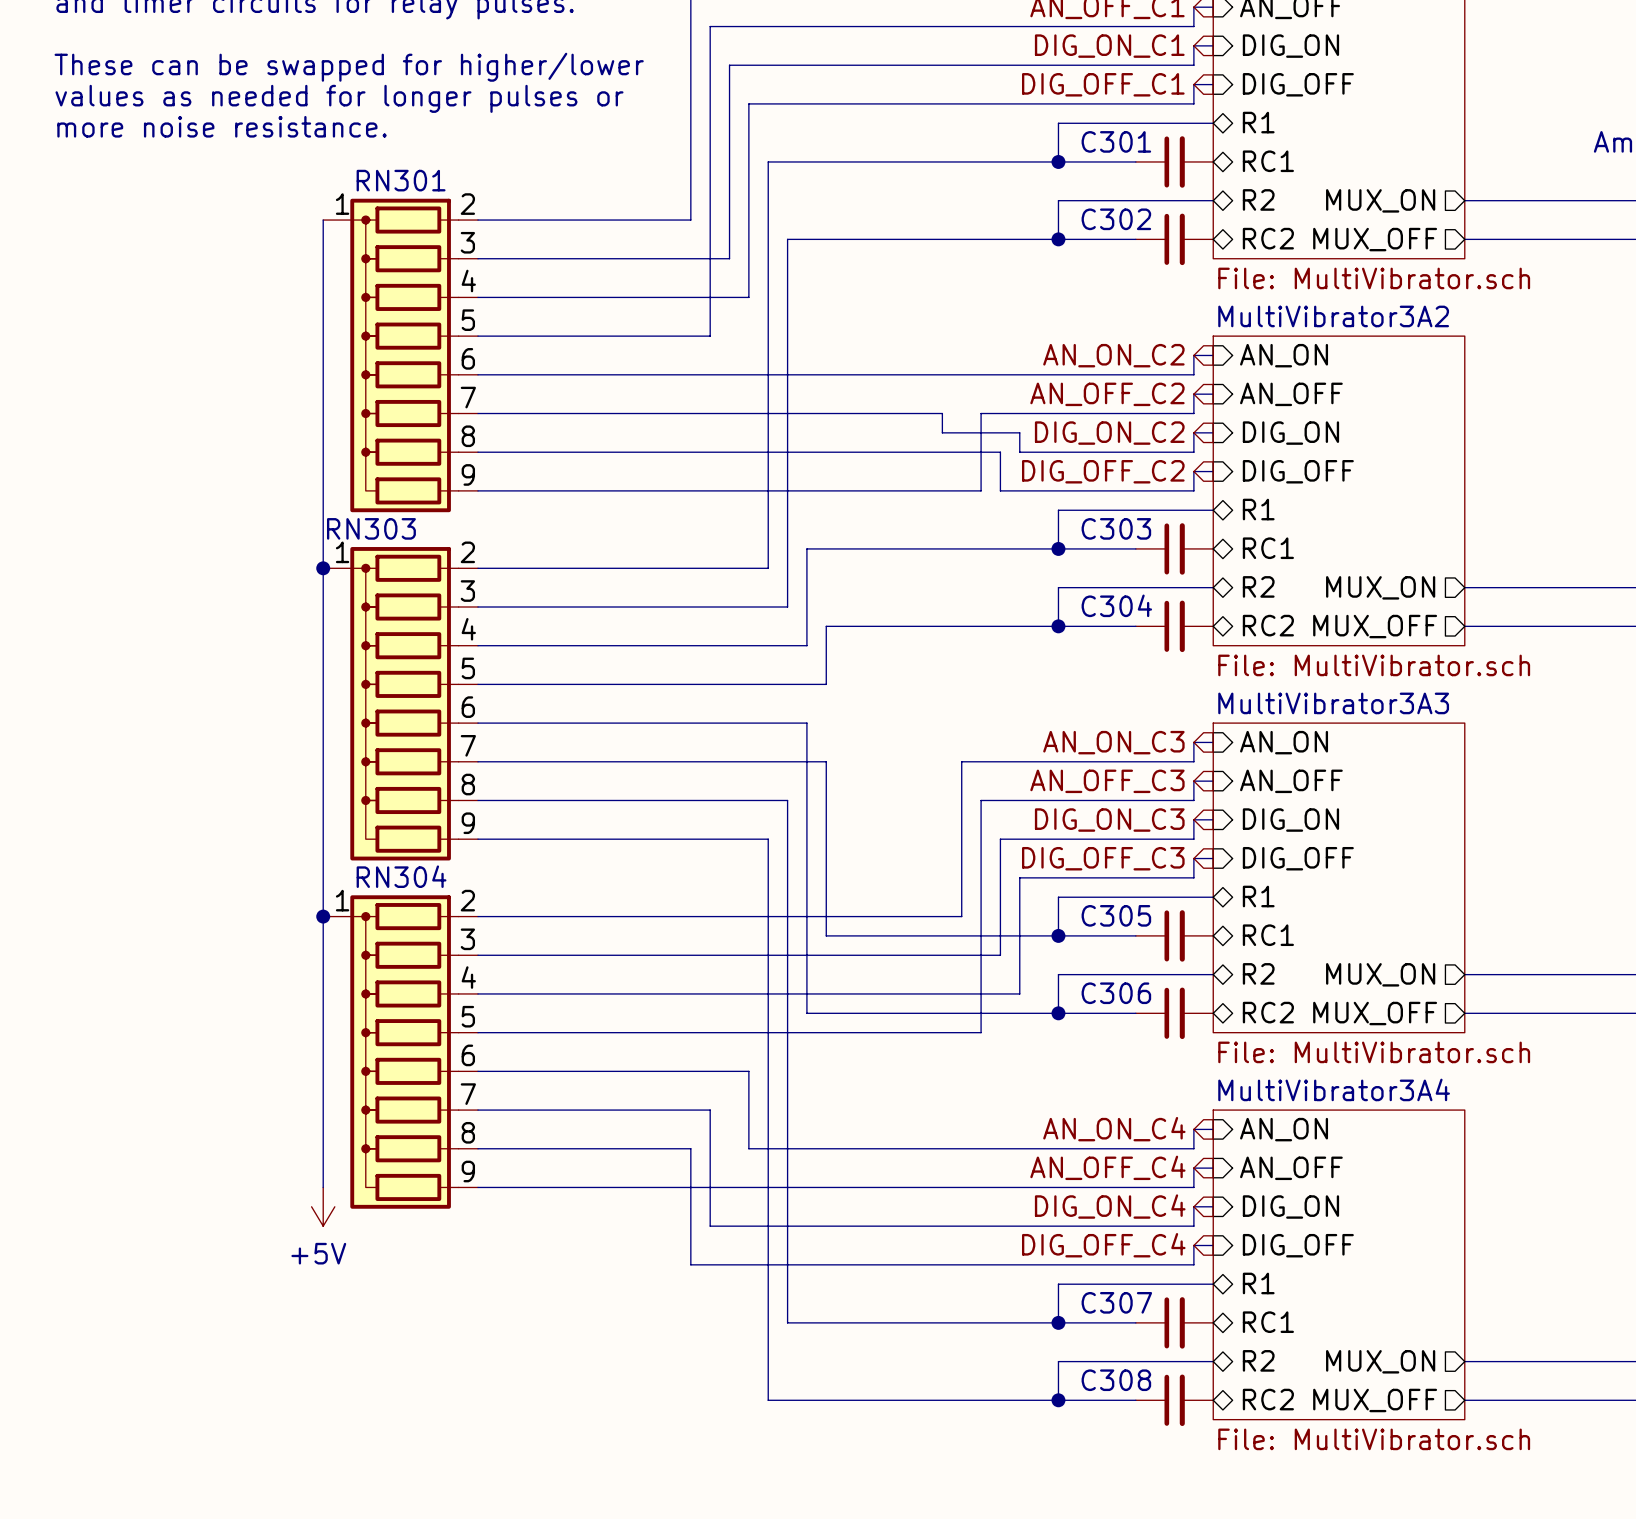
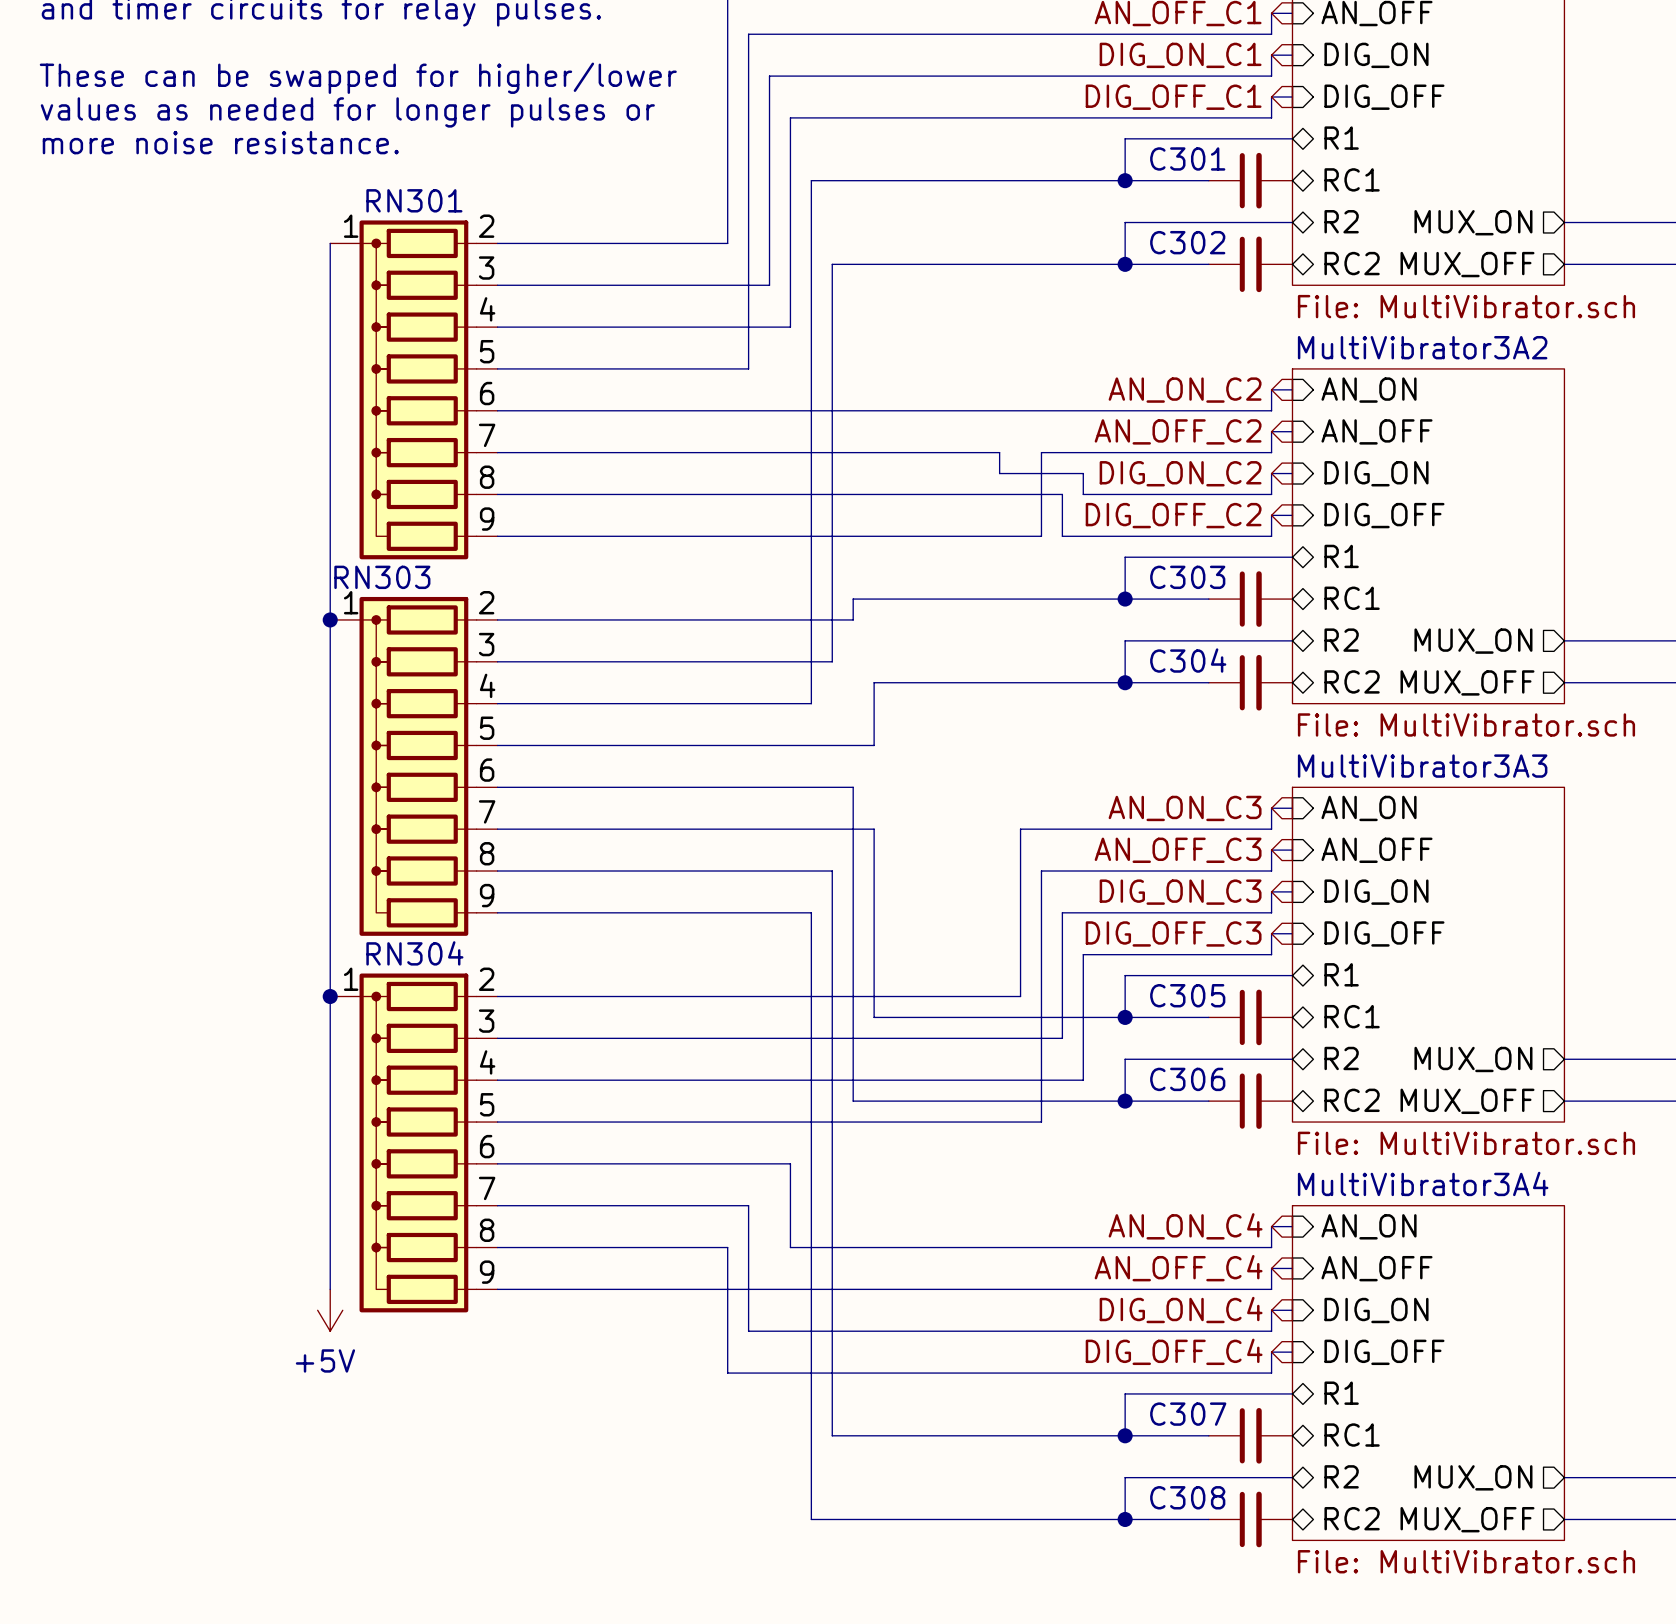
wire: (806, 568) (806, 645) (768, 645) -> (853, 619) (811, 619) (811, 703)

